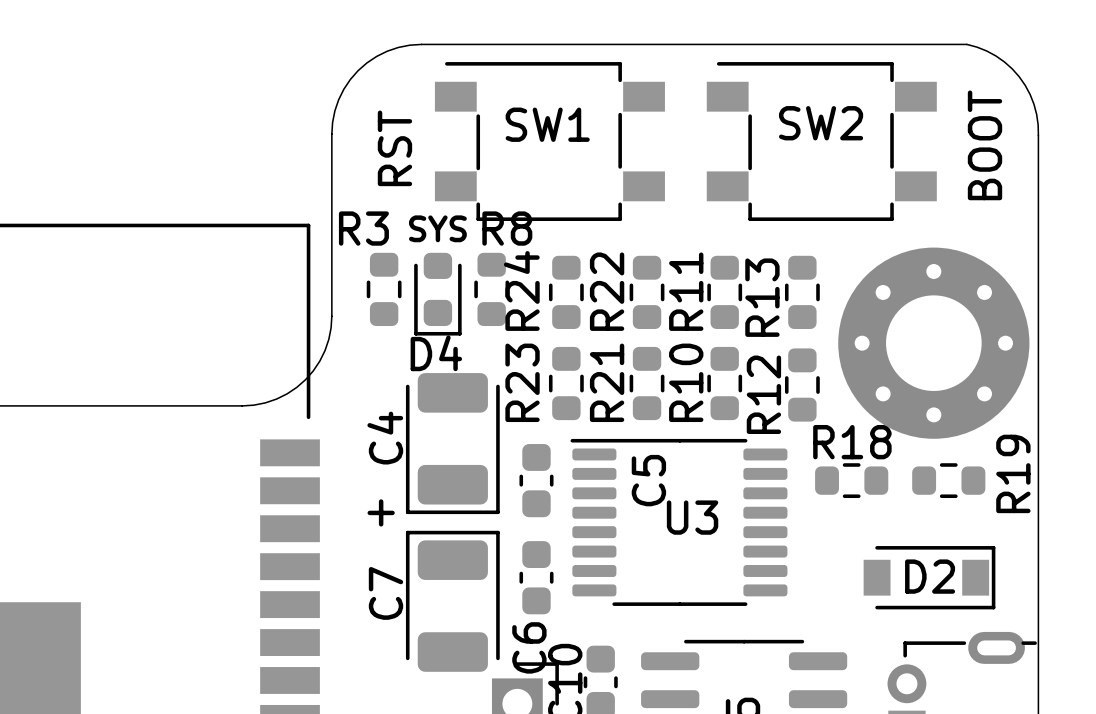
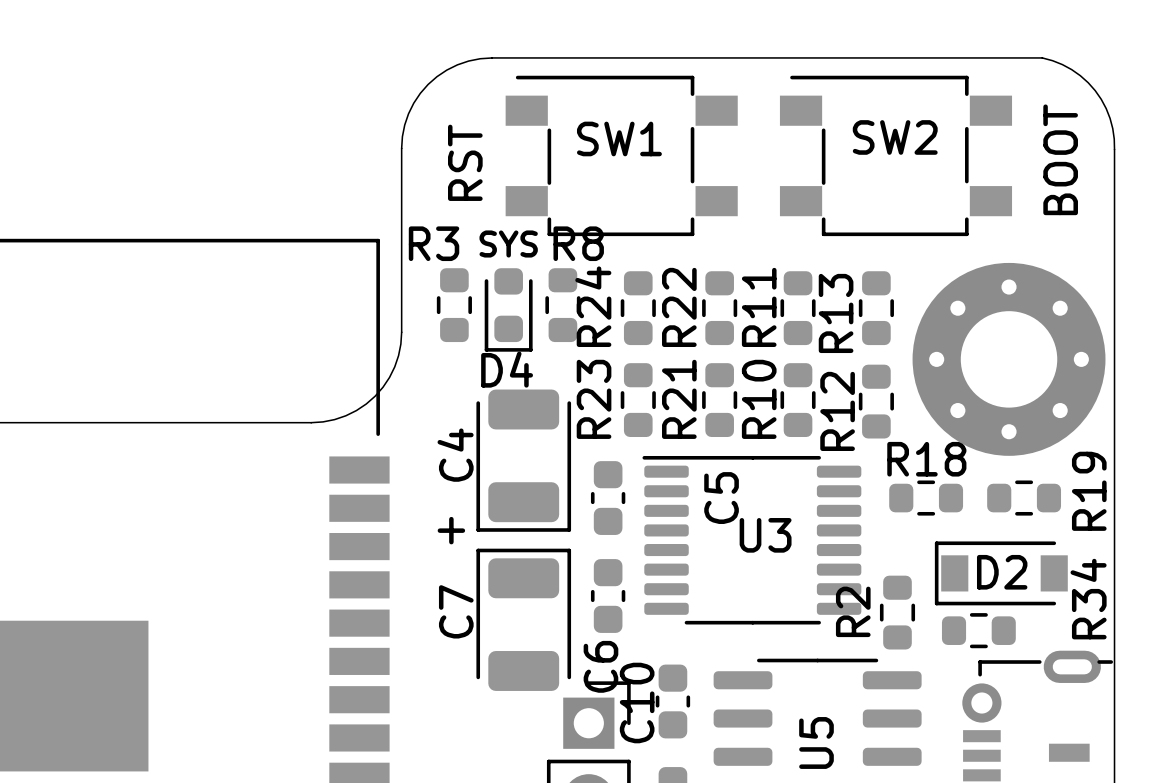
D2 rotation: 0° (929, 577) -> 180° (1001, 573)
R2: none -> (897, 612)
R34: none -> (978, 630)

